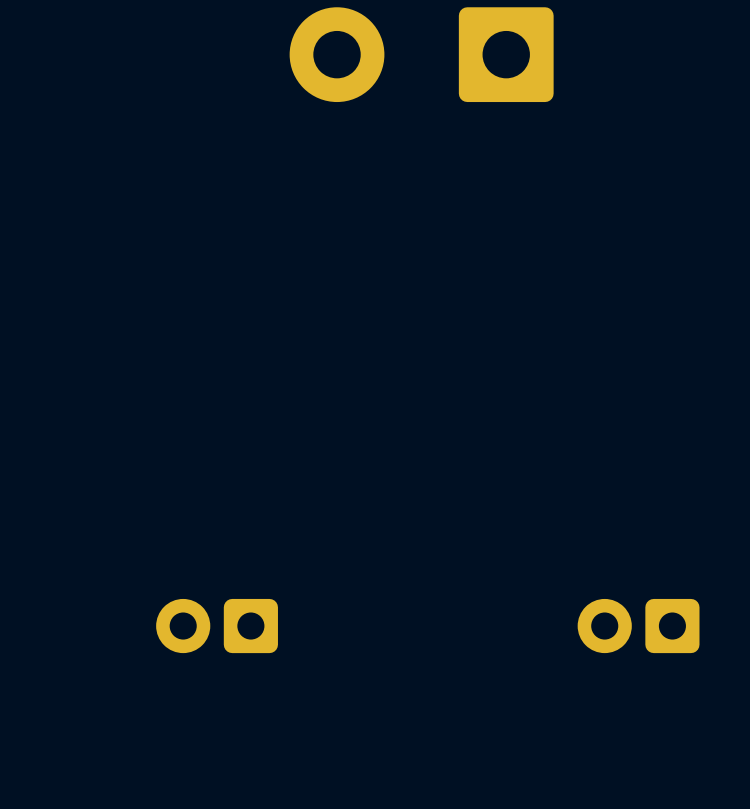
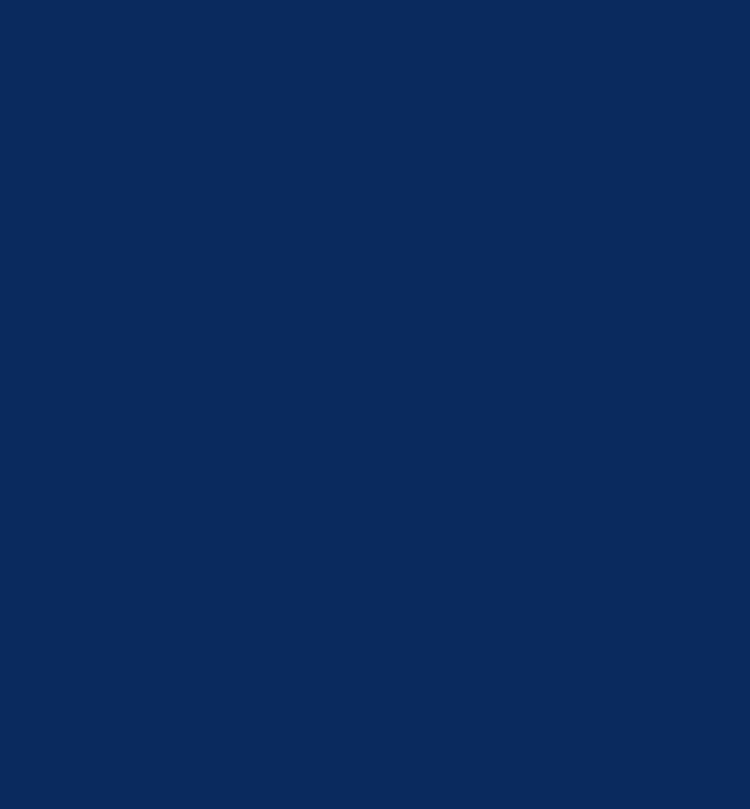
part: (421, 54) -> none
part: (217, 626) -> none
part: (638, 626) -> none

